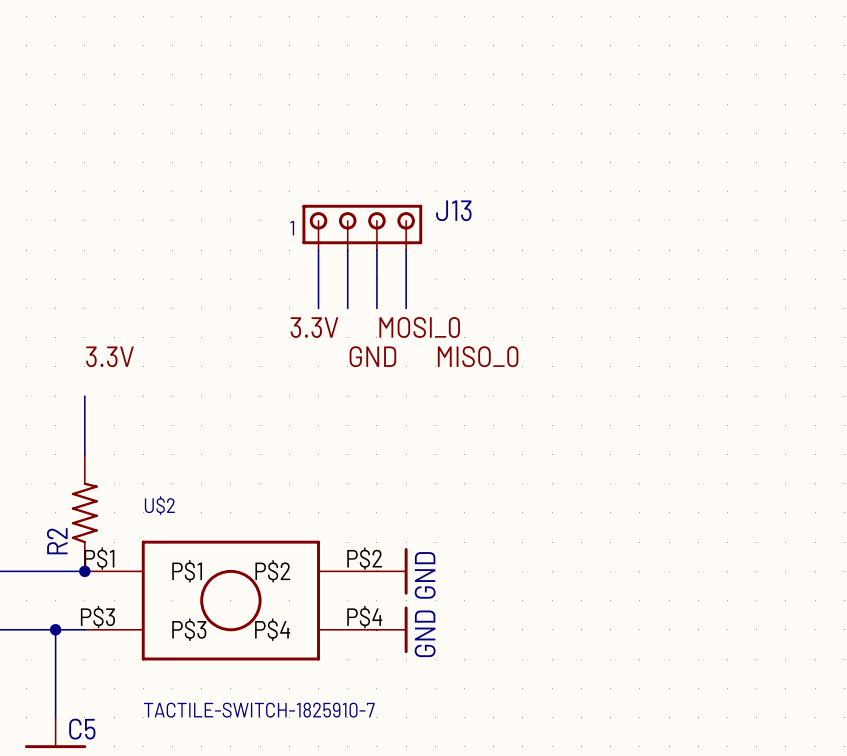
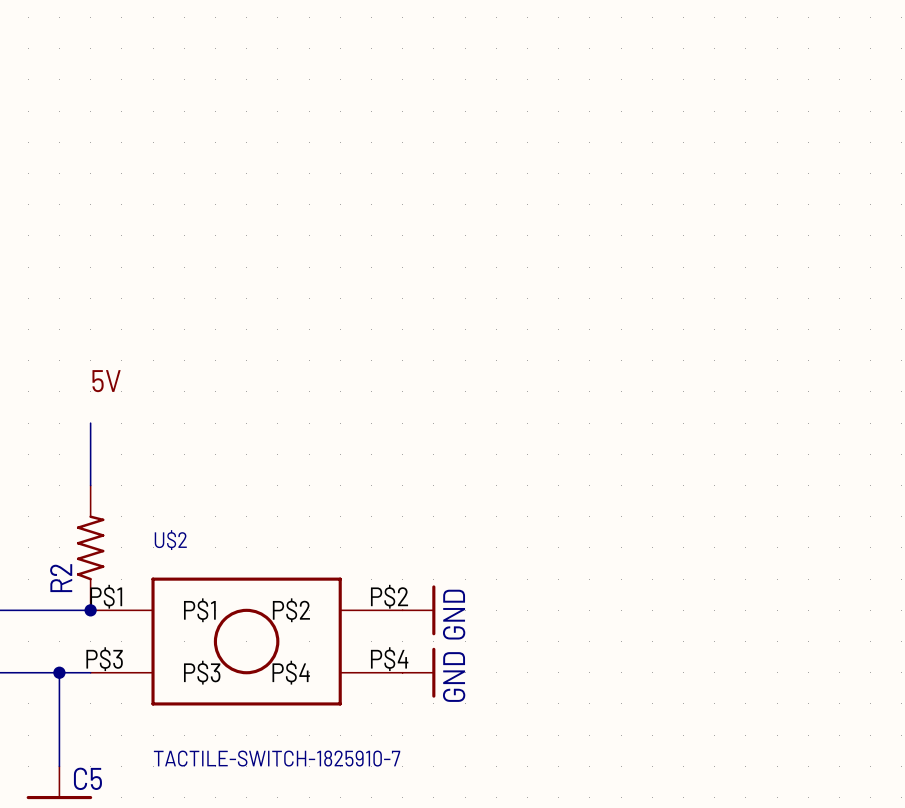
J13: (362, 227) -> none
wire: (318, 250) (318, 308) -> none
wire: (347, 250) (347, 308) -> none
wire: (376, 250) (376, 308) -> none
wire: (406, 250) (406, 308) -> none
label: 3.3V (314, 327) -> none
label: MOSI_0 (419, 327) -> none
label: 3.3V (109, 356) -> 5V (106, 381)
label: GND (372, 356) -> none
label: MISO_0 (478, 356) -> none

